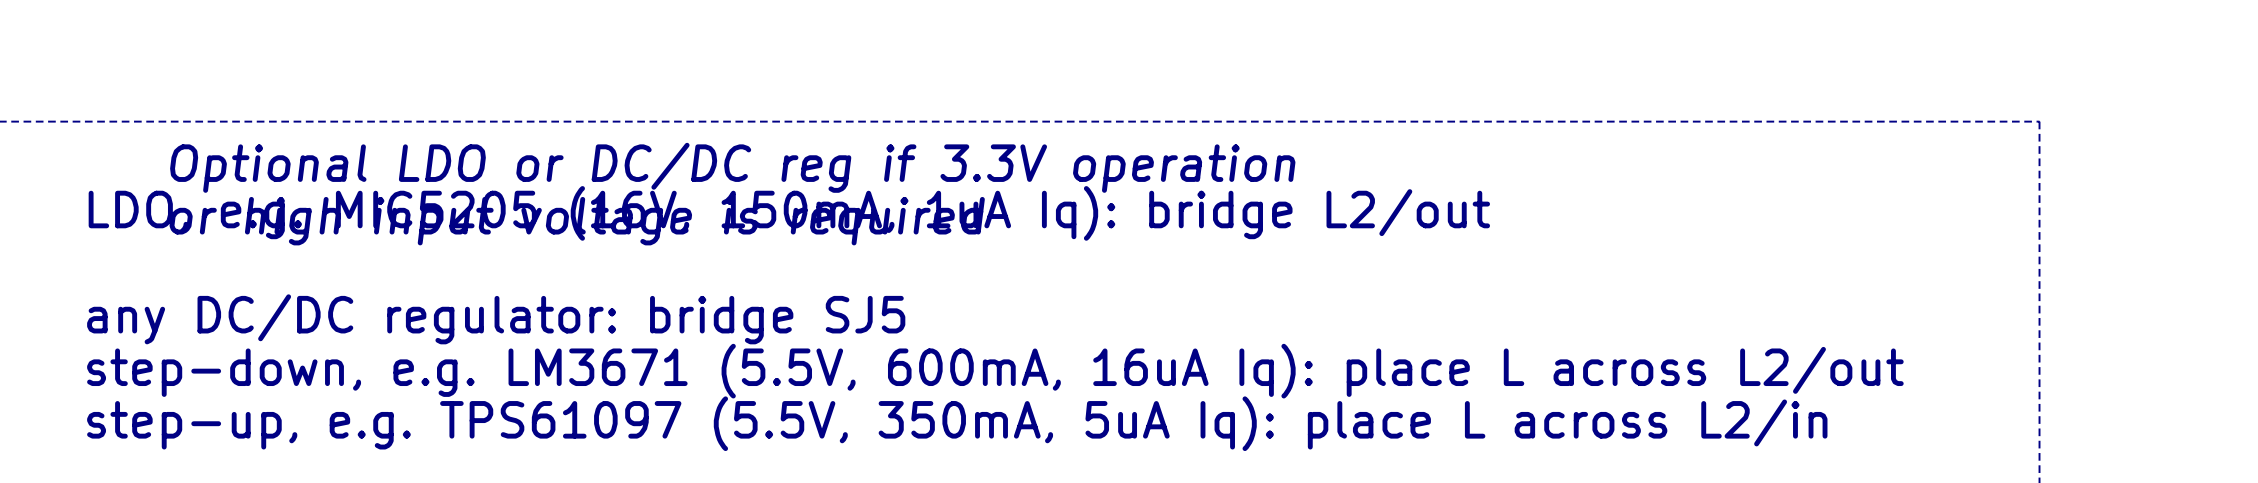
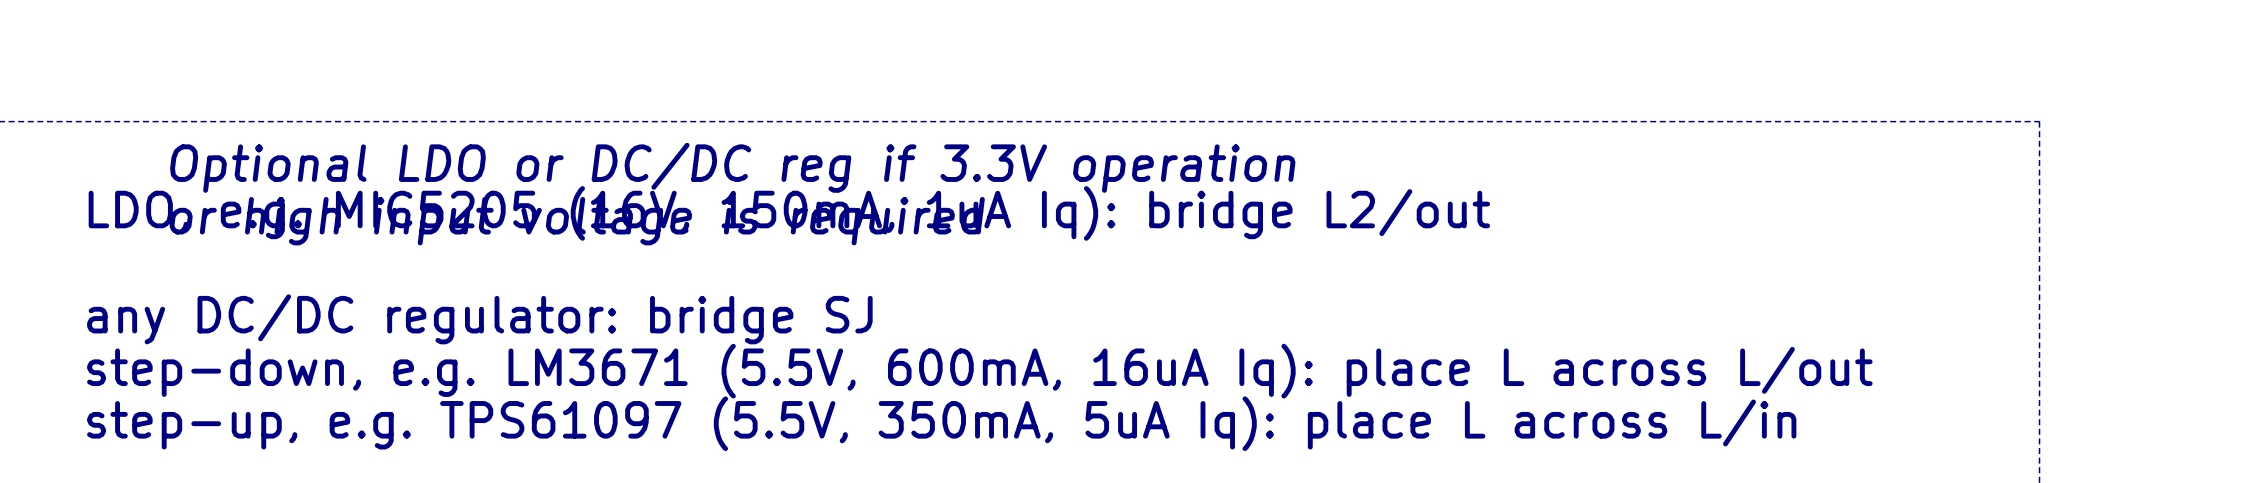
text: any DC/DC regulator: bridge SJ5 (496, 319) -> any DC/DC regulator: bridge SJ (479, 319)
text: step-down, e.g. LM3671 (5.5V, 600mA, 16uA Iq): place L across L2/out (995, 371) -> step-down, e.g. LM3671 (5.5V, 600mA, 16uA Iq): place L across L/out (979, 371)
text: step-up, e.g. TPS61097 (5.5V, 350mA, 5uA Iq): place L across L2/in (957, 423) -> step-up, e.g. TPS61097 (5.5V, 350mA, 5uA Iq): place L across L/in (941, 423)

